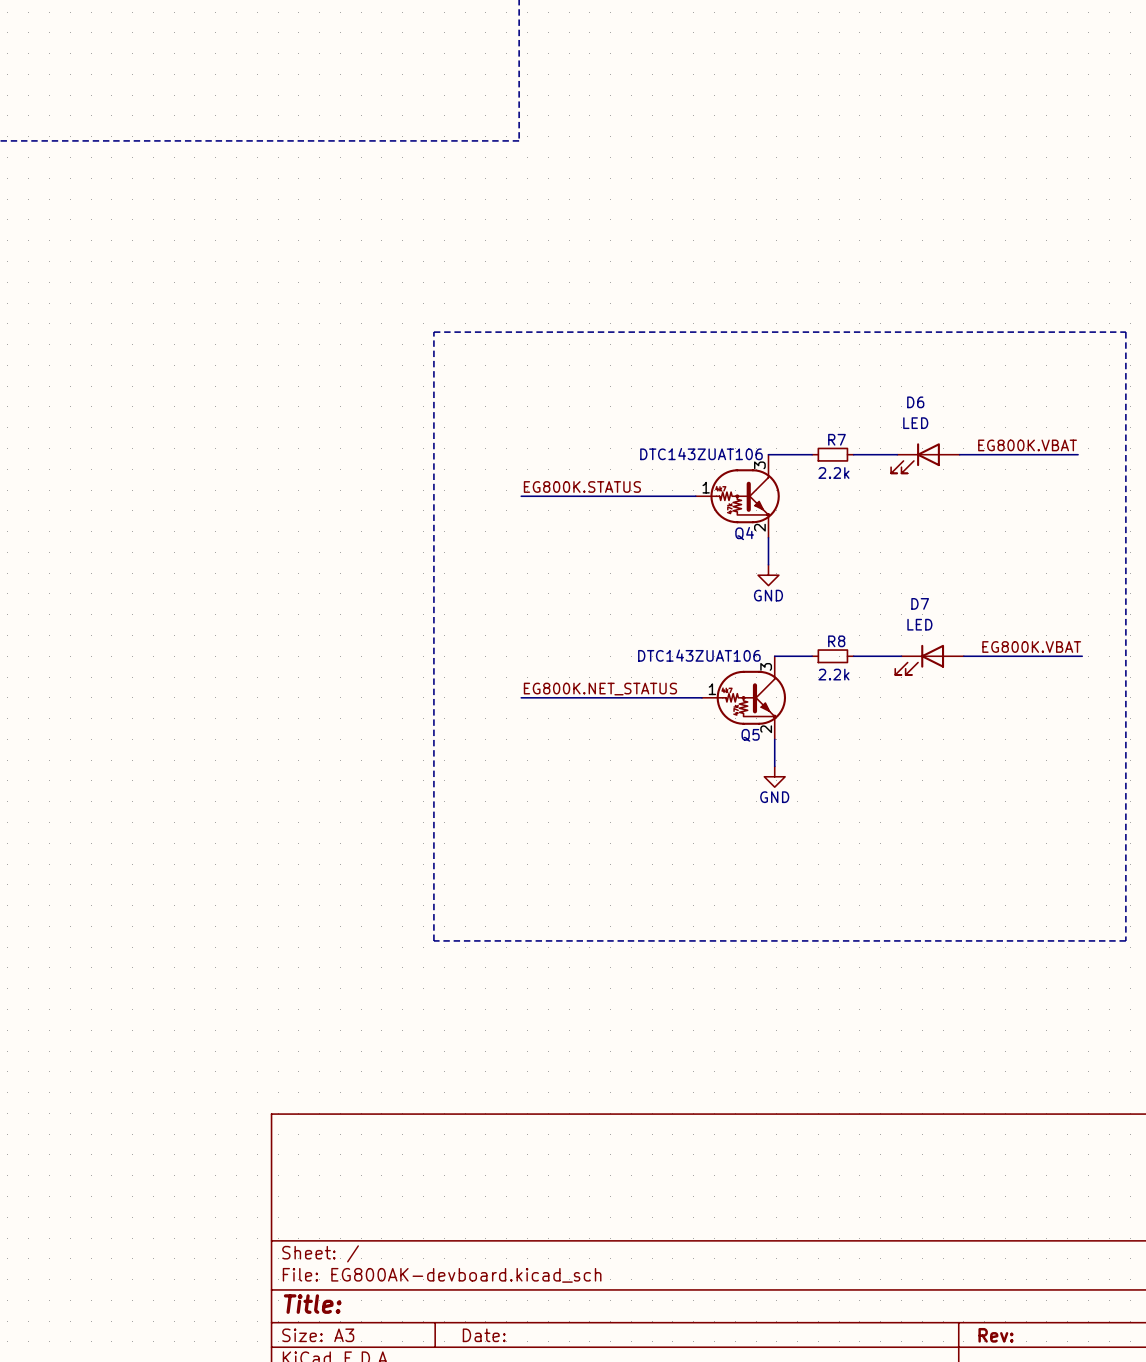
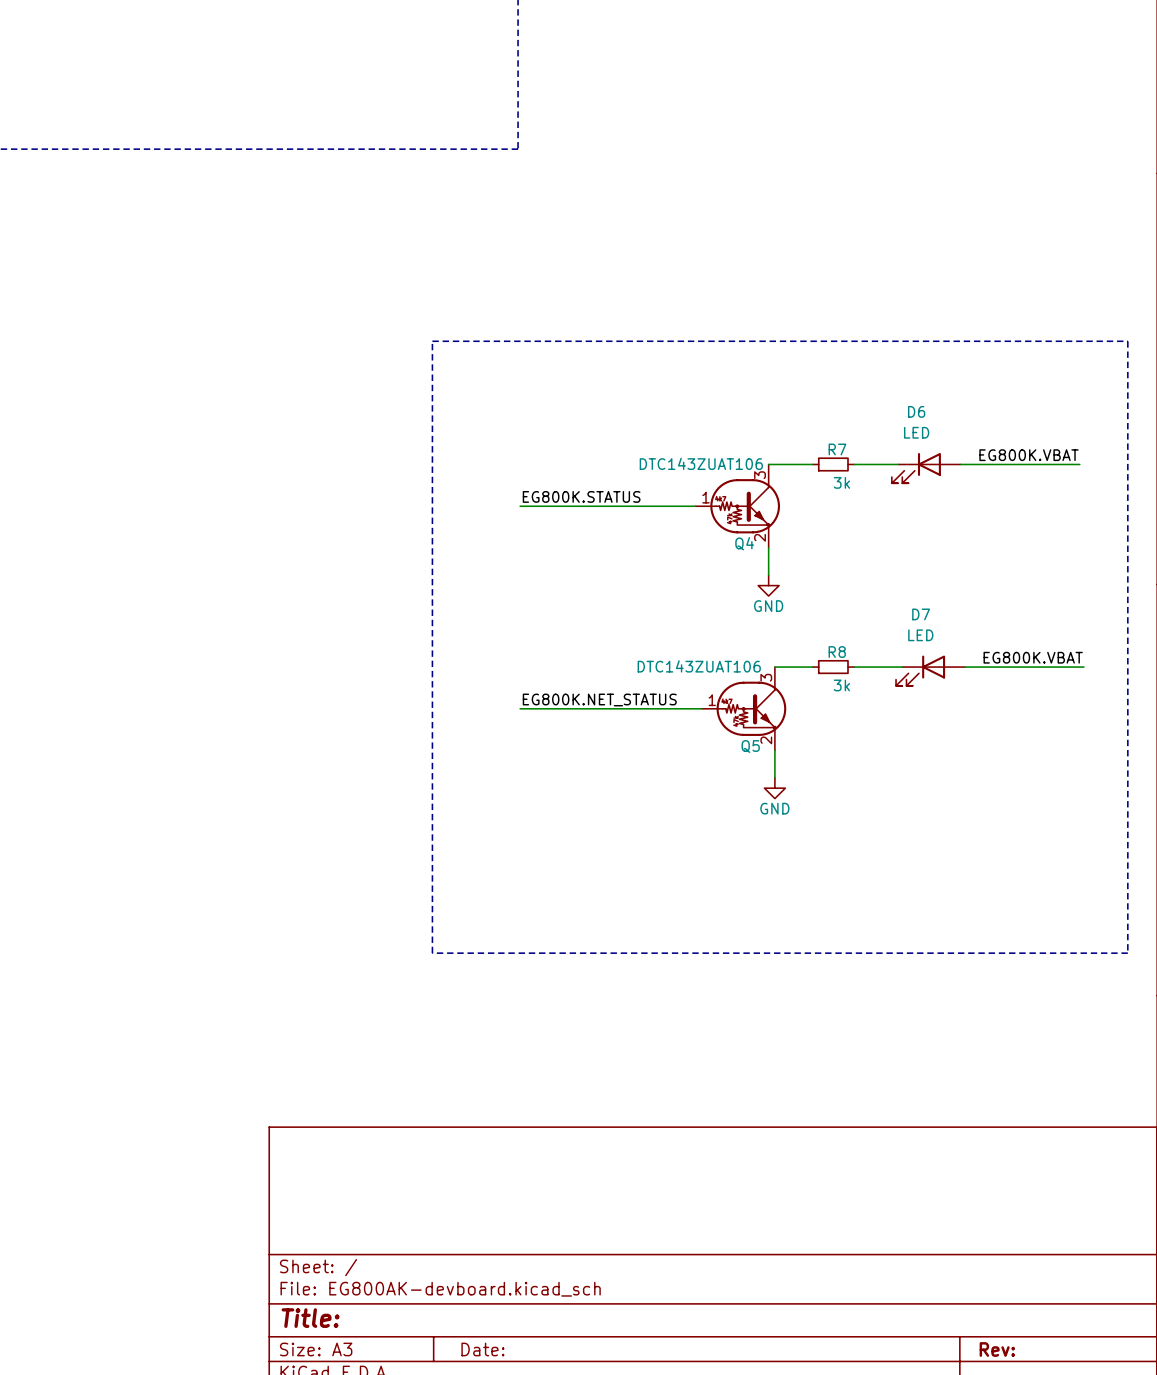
R7 value: 2.2k (833, 473) -> 3k (841, 482)
R8 value: 2.2k (833, 674) -> 3k (841, 685)

